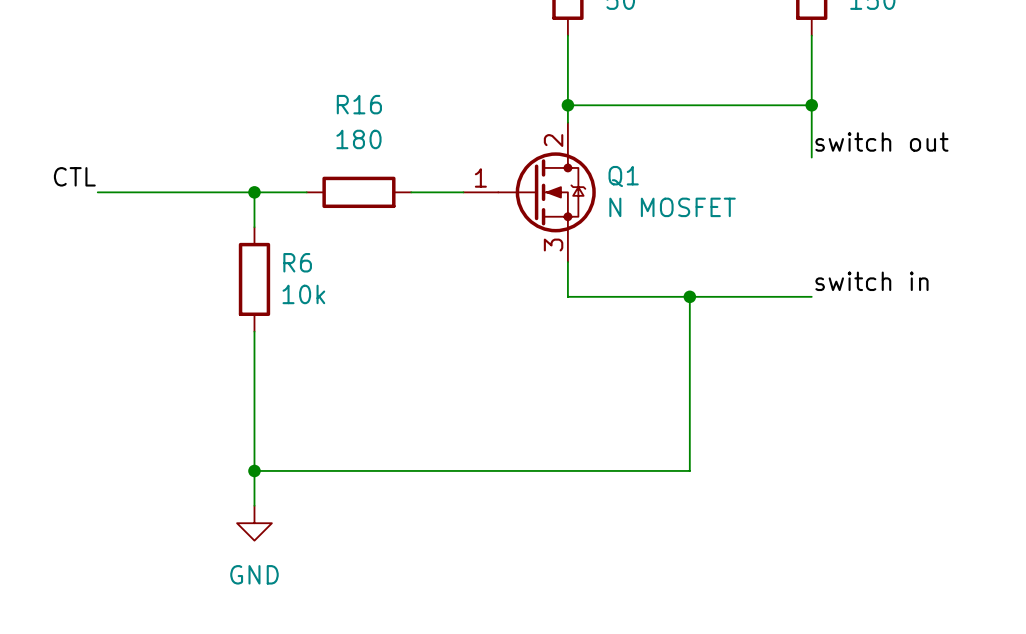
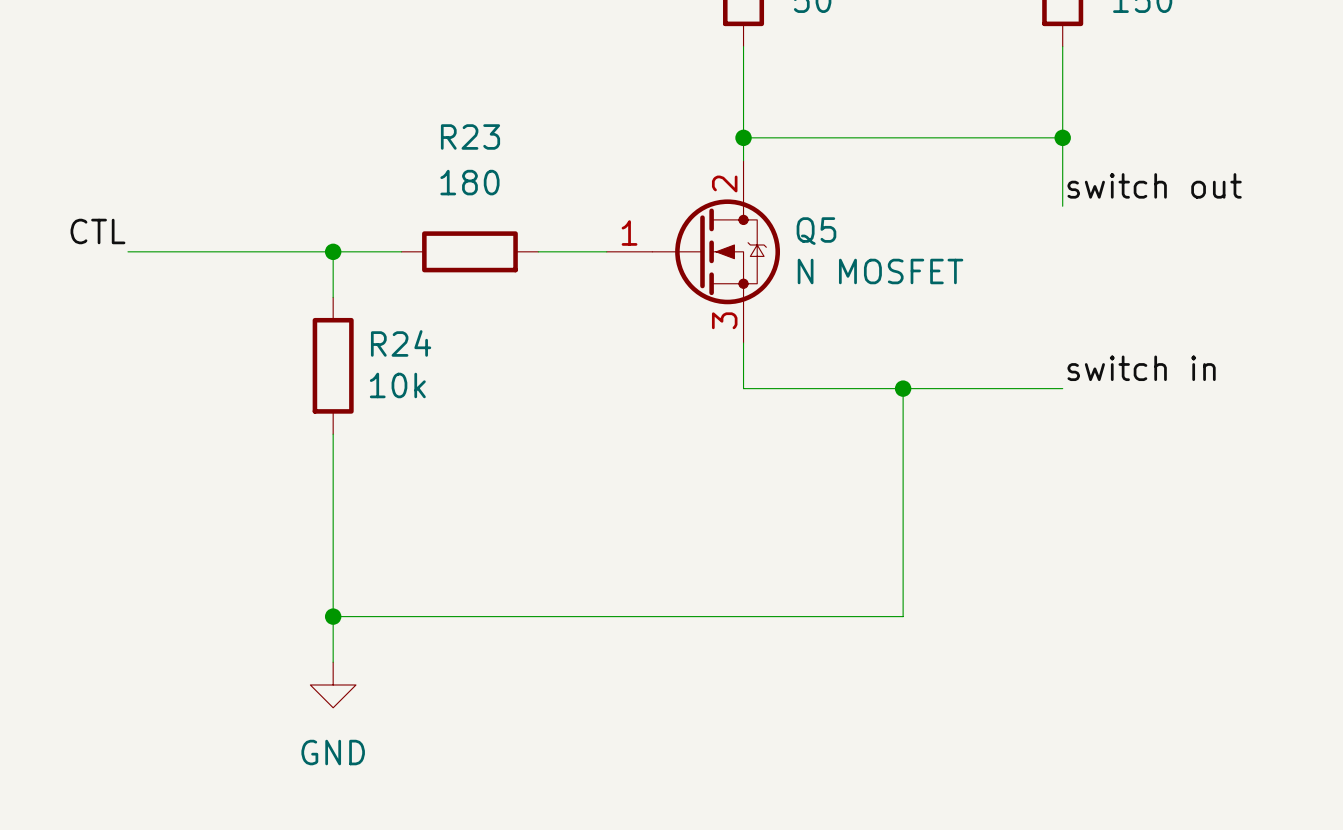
R16 name: R16 (359, 104) -> R23 (470, 136)
Q1 name: Q1 (623, 176) -> Q5 (816, 231)
R6 name: R6 (297, 262) -> R24 (401, 343)

